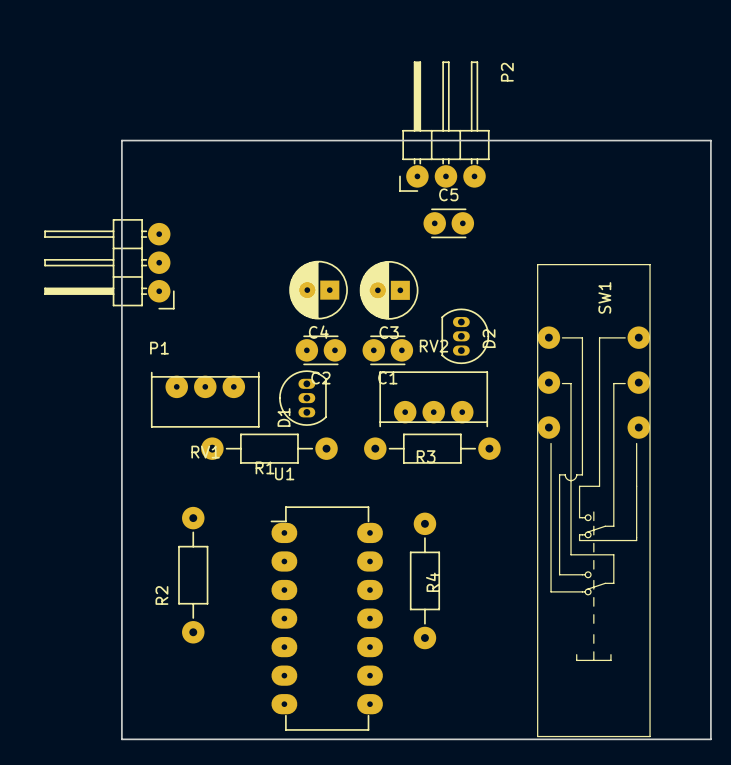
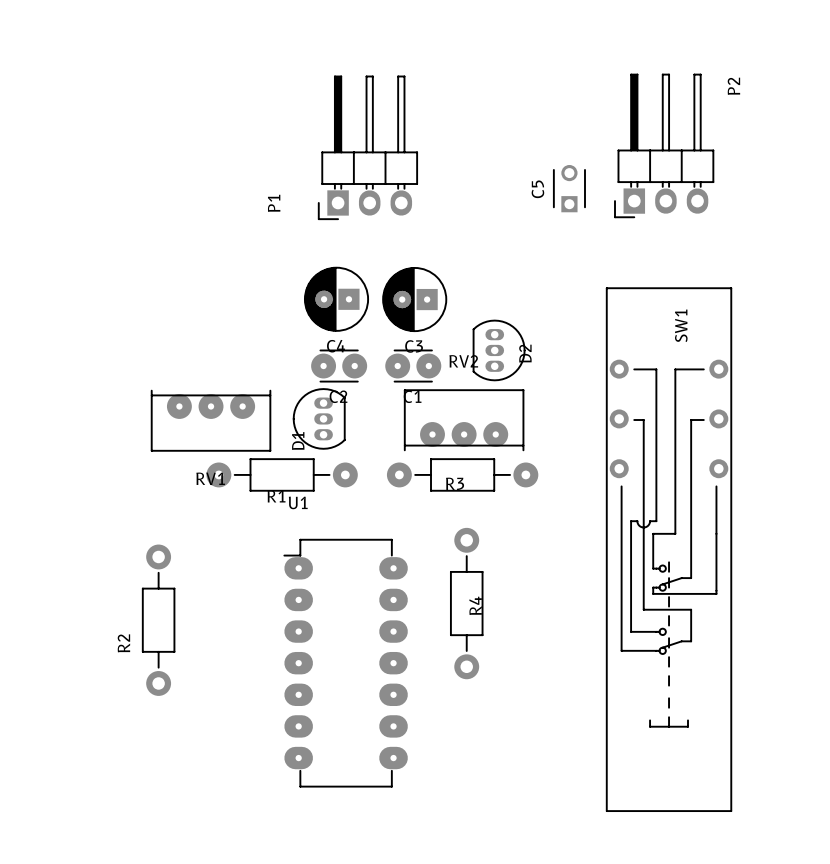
P2 footprint: [399, 61, 490, 192] -> [614, 73, 715, 219]
board edge: (121, 140) (710, 140) (710, 739) (121, 739) (121, 140) -> none
C5 name position: C5 (448, 194) -> C5 (537, 189)
C5 footprint: [423, 208, 475, 239] -> [552, 164, 586, 213]
P1 footprint: [44, 219, 175, 310] -> [317, 75, 419, 221]
SW1 footprint: [537, 264, 651, 737] -> [606, 287, 732, 812]
P1 name position: P1 (159, 348) -> P1 (274, 203)
R2 footprint: [178, 506, 209, 644] -> [141, 544, 176, 696]
R4 footprint: [409, 512, 441, 650] -> [449, 527, 484, 680]

